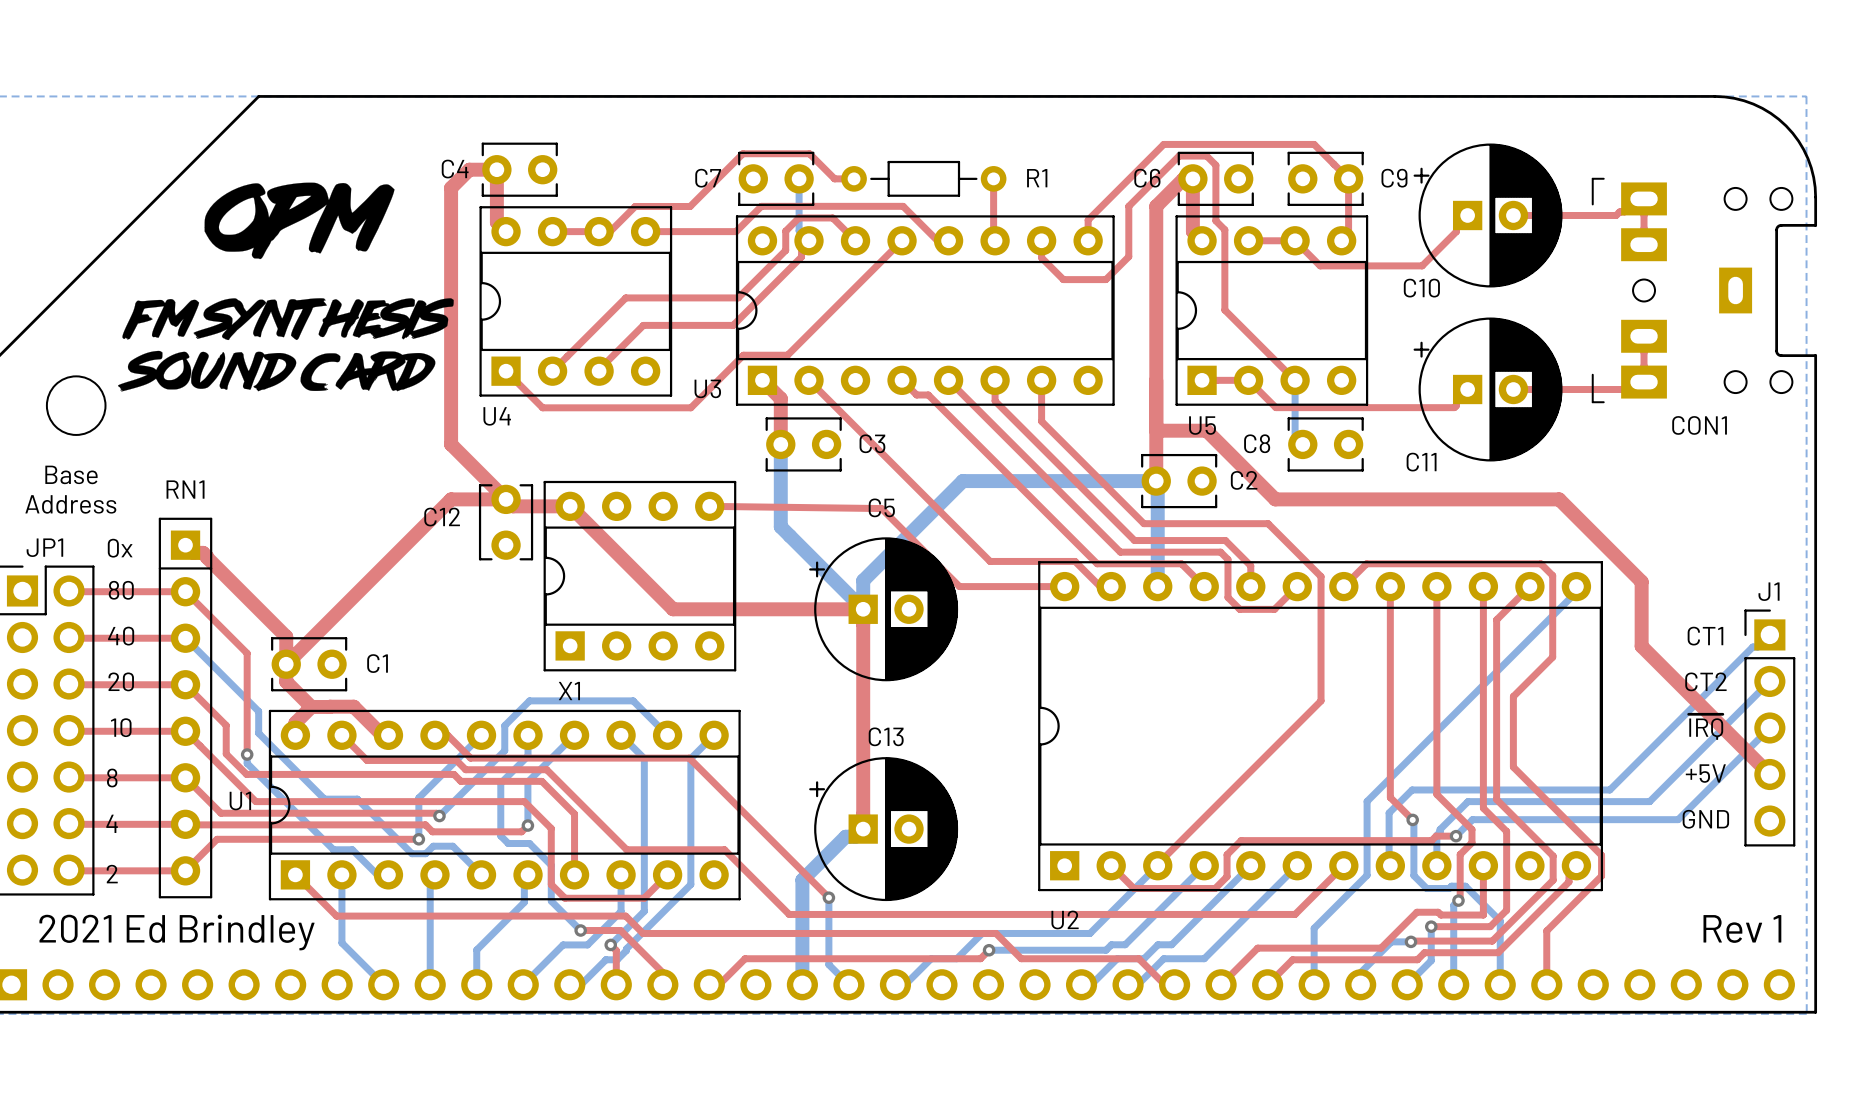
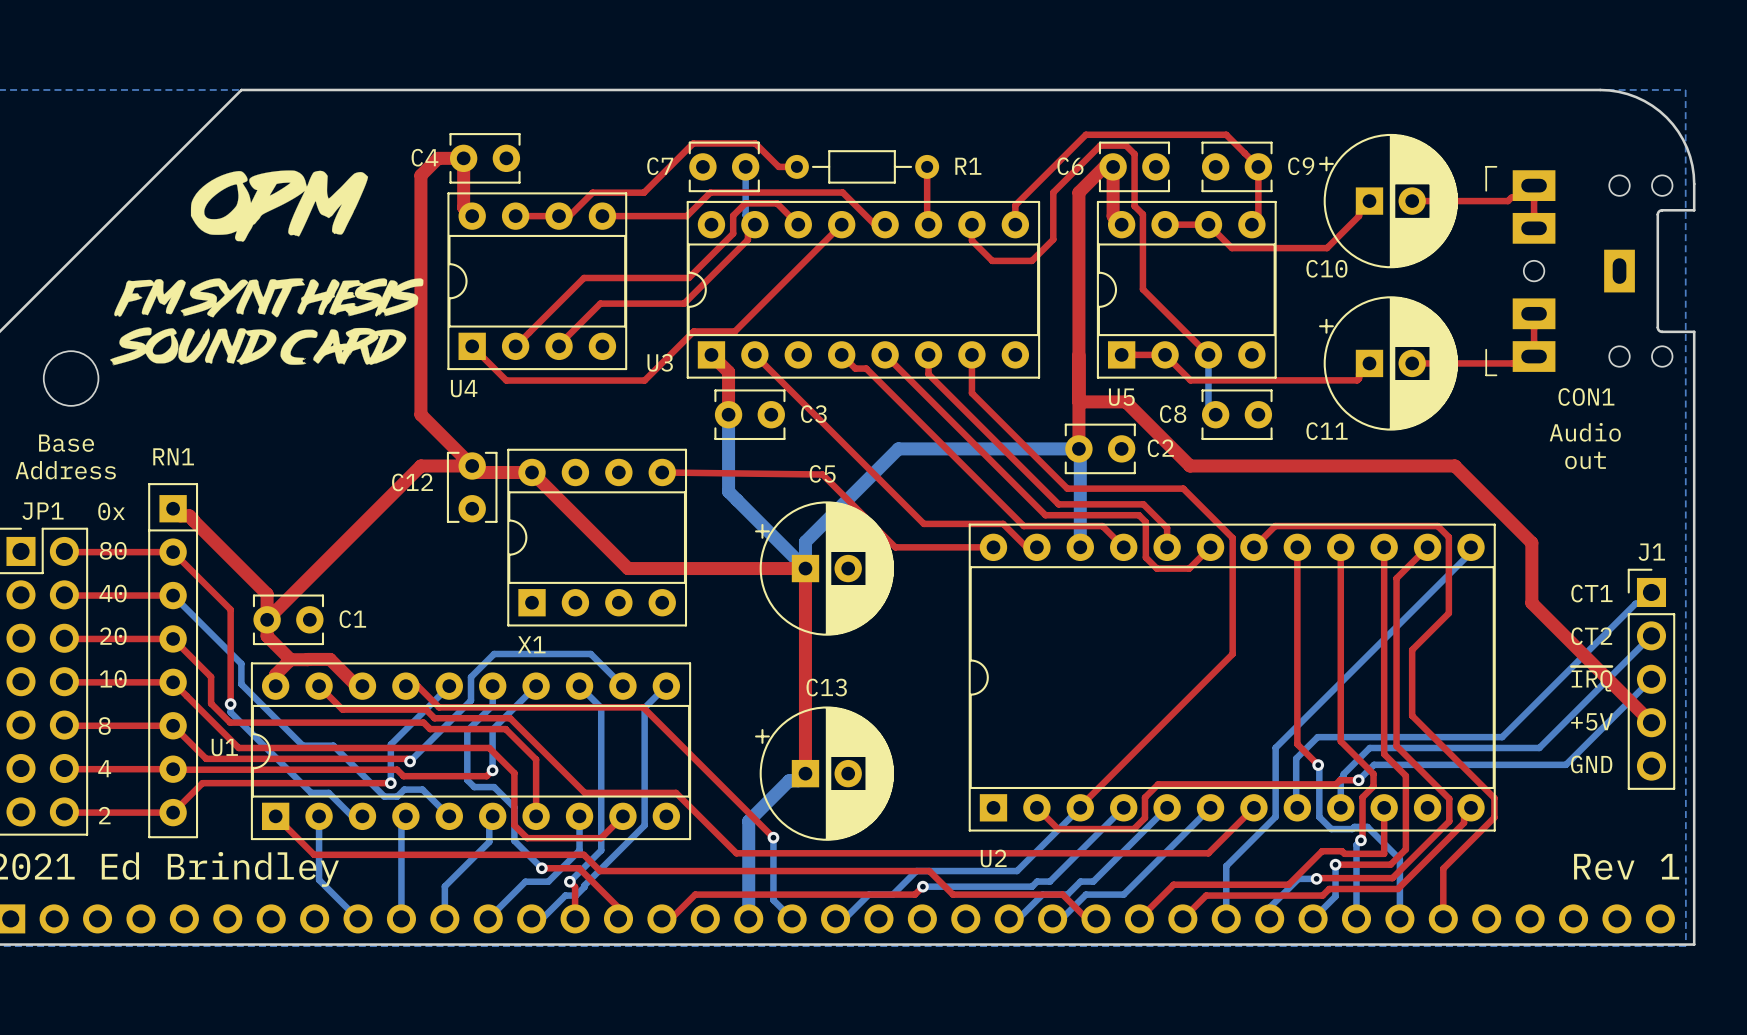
text: none -> Audio (1585, 432)
text: none -> out (1585, 460)

